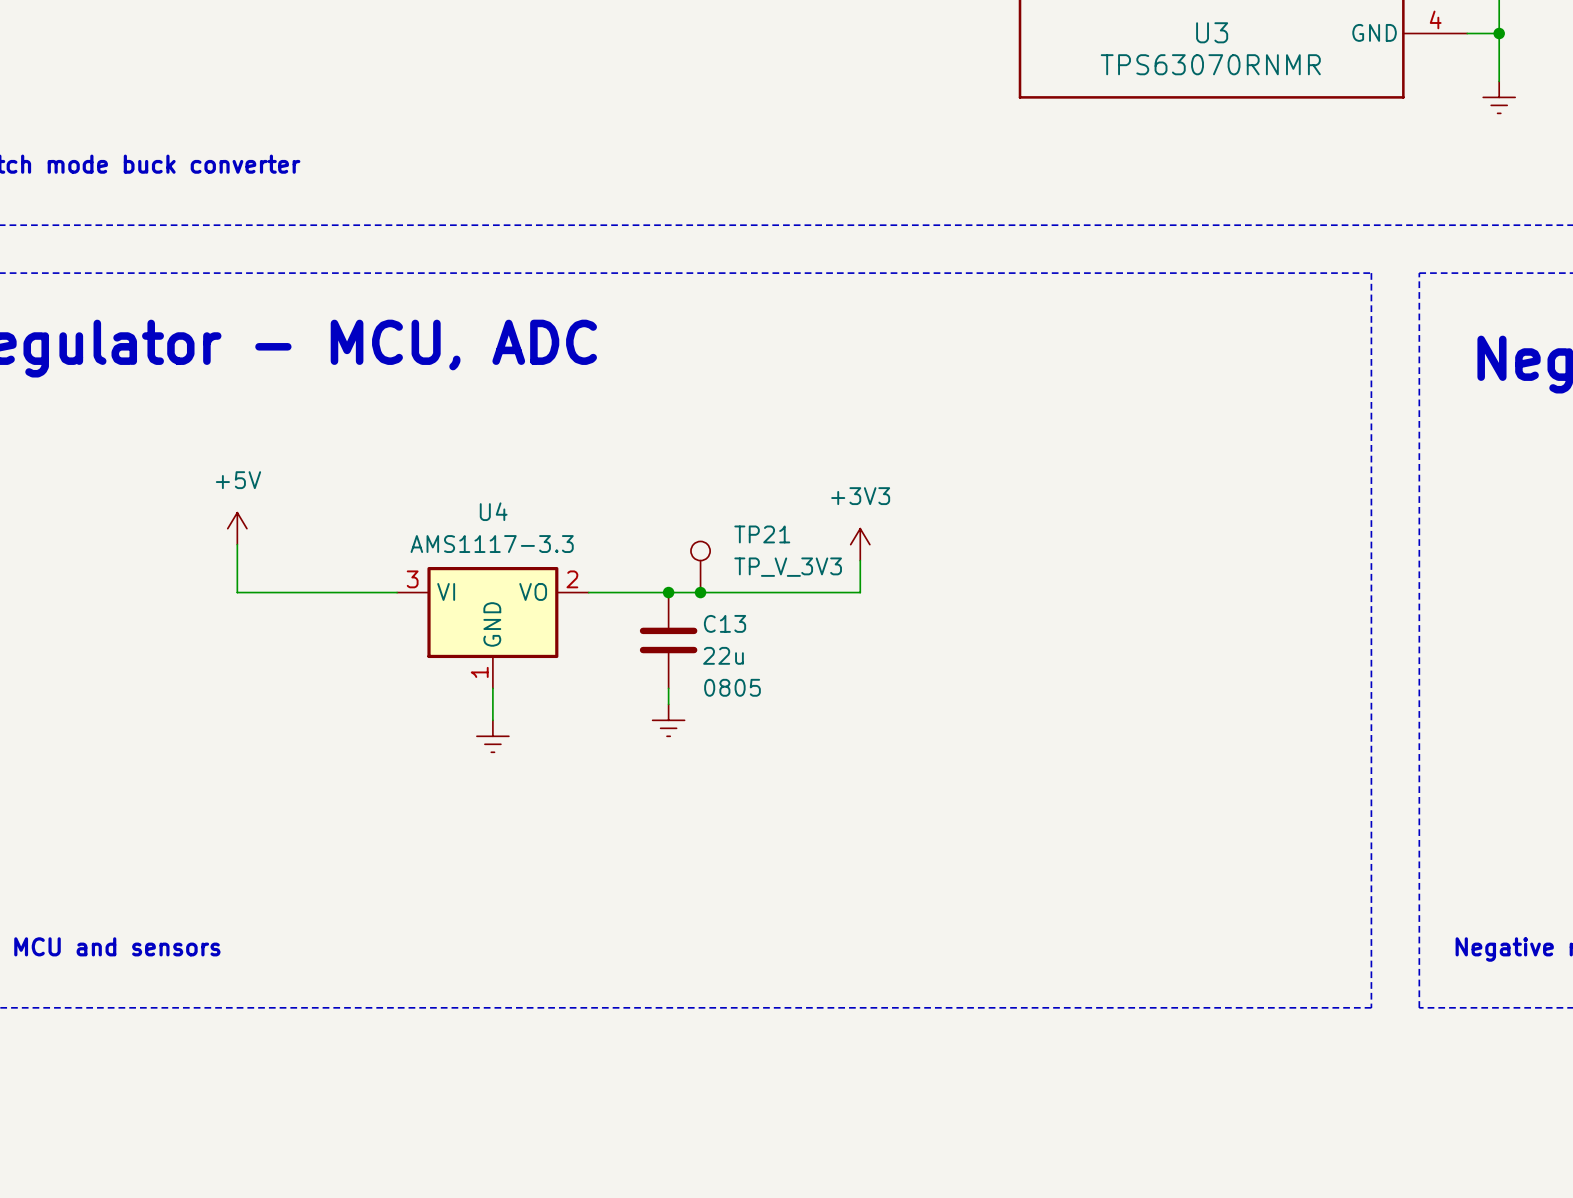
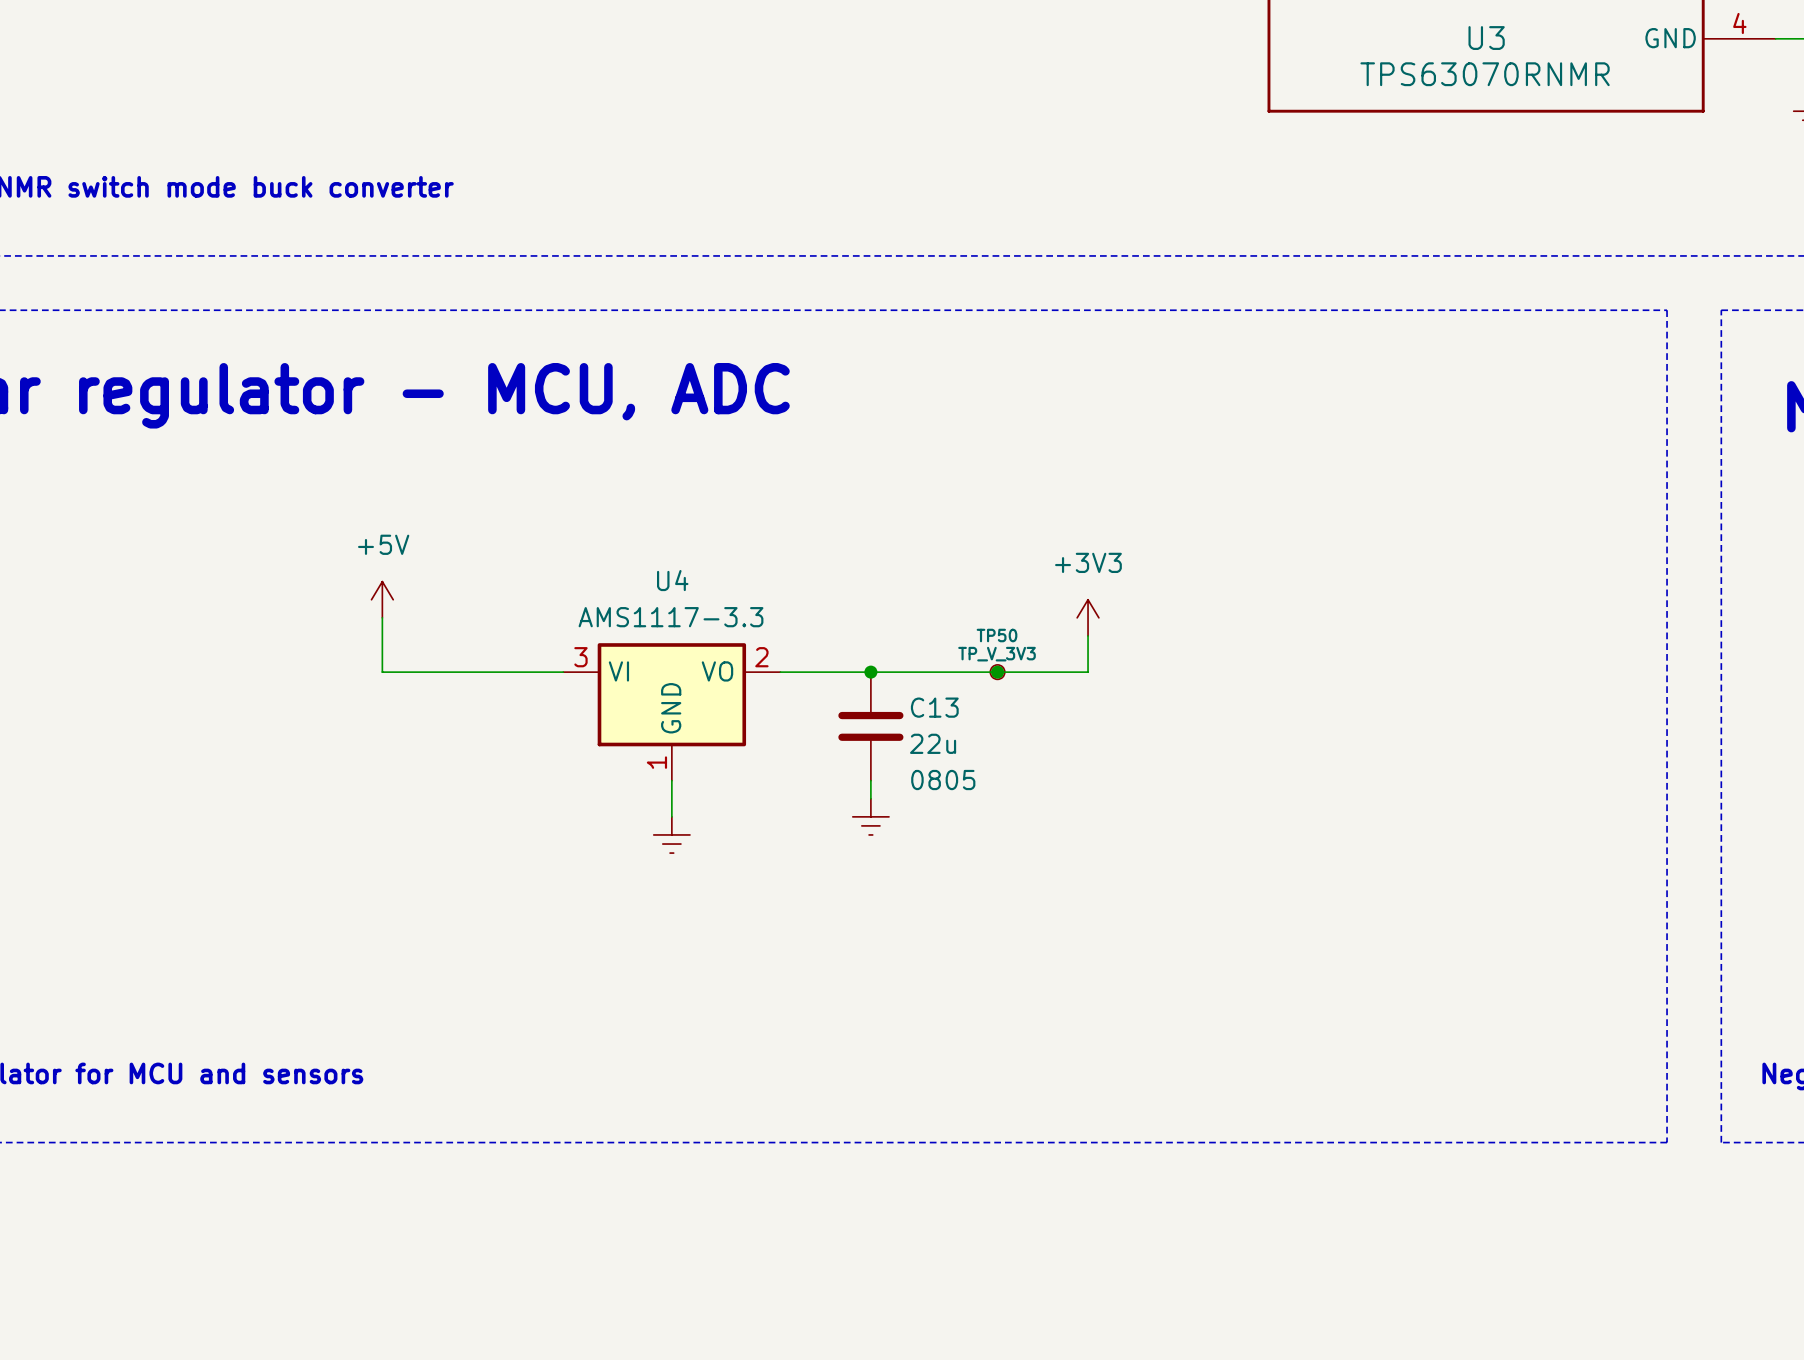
TP21: TP_V_3V3 (700, 566) -> none
junction: (700, 592) -> none
junction: none -> (997, 672)
TP50: none -> TP_V_3V3 (997, 672)

